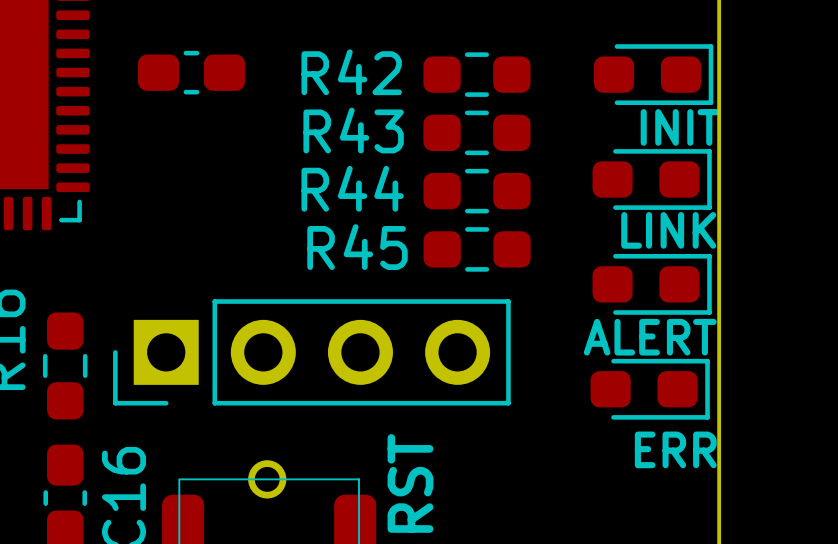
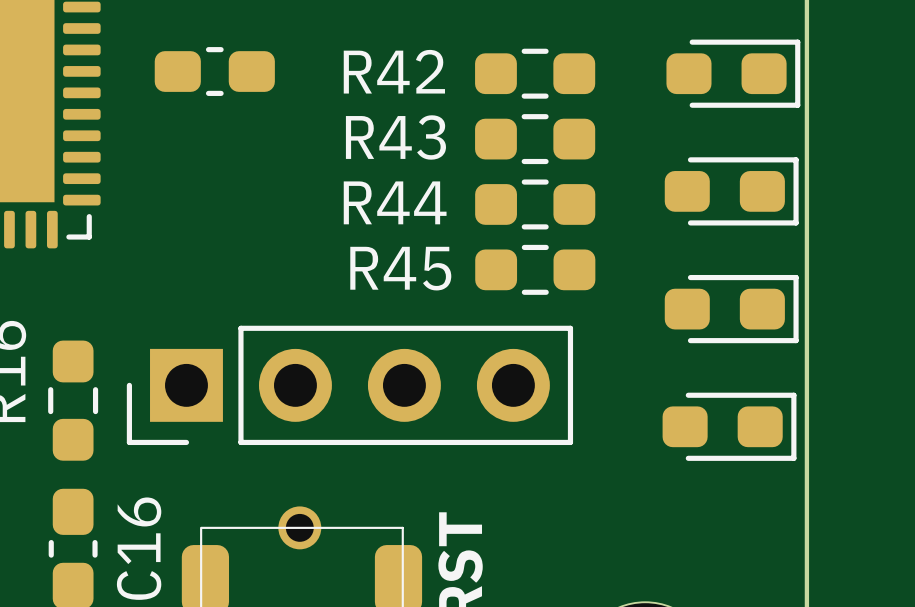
text: INIT (680, 127) -> none
text: LINK (668, 230) -> none
text: ALERT (650, 337) -> none
text: ERR (675, 449) -> none

